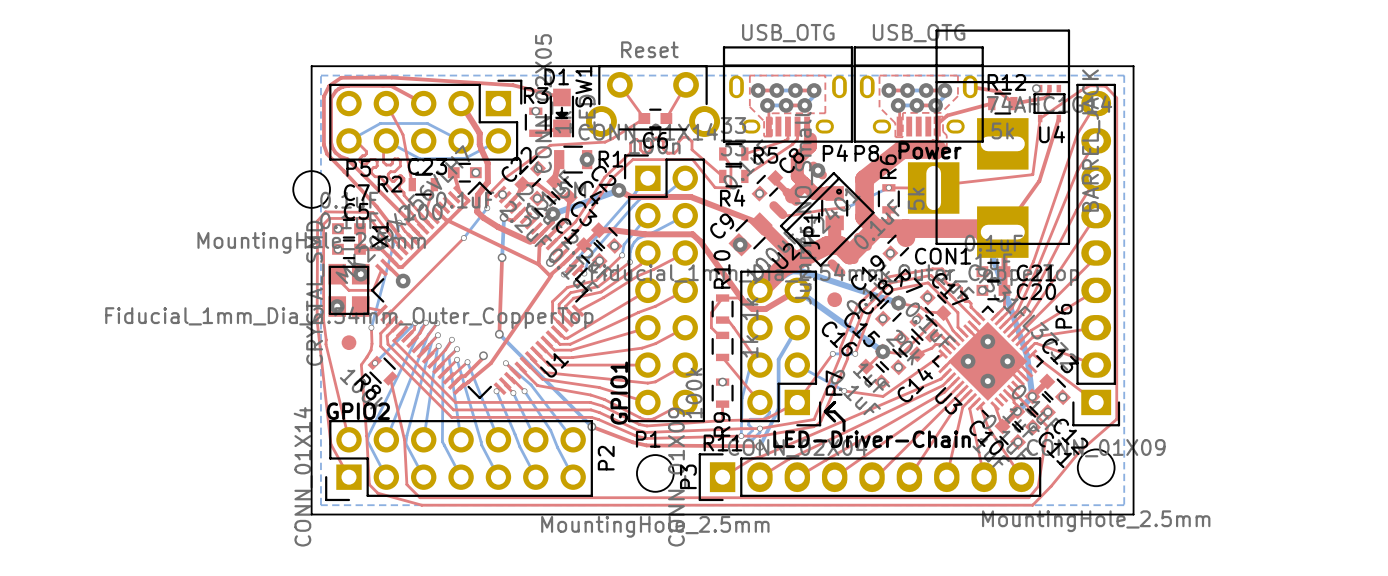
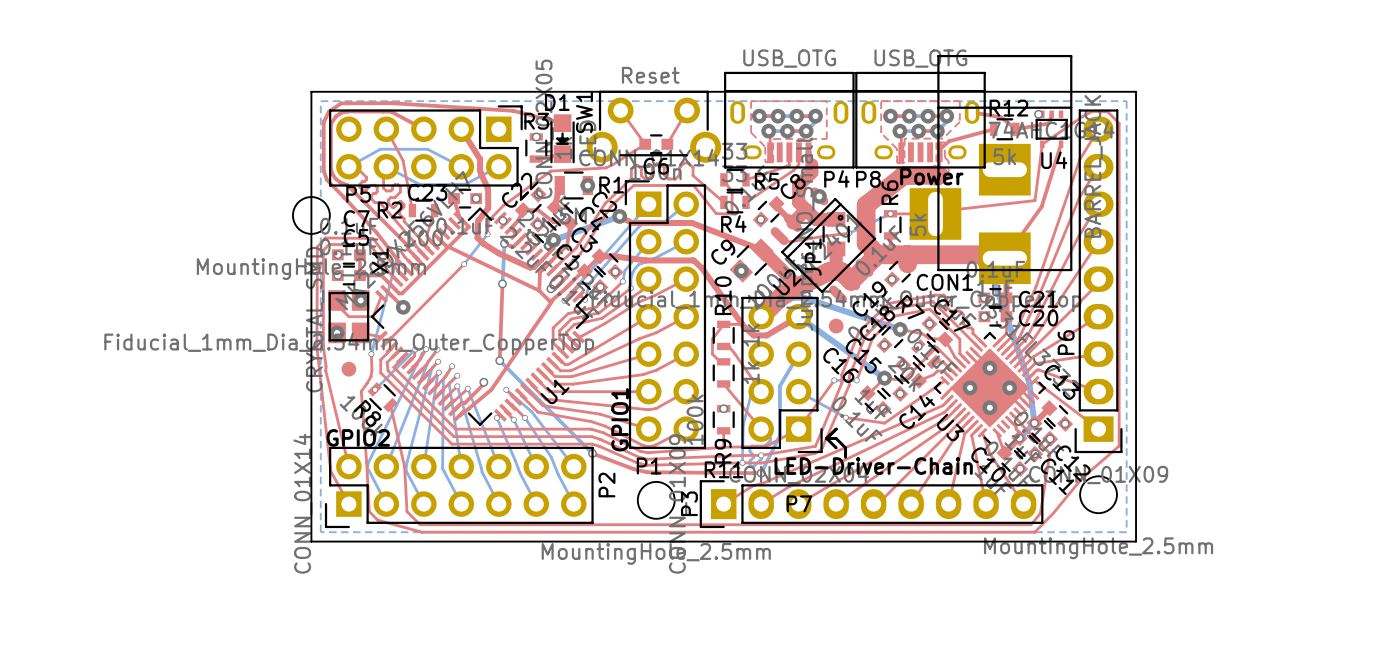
P7 name rotation: 0° (834, 383) -> 90° clockwise (799, 503)
P7 name position: P7 (834, 383) -> P7 (799, 503)

